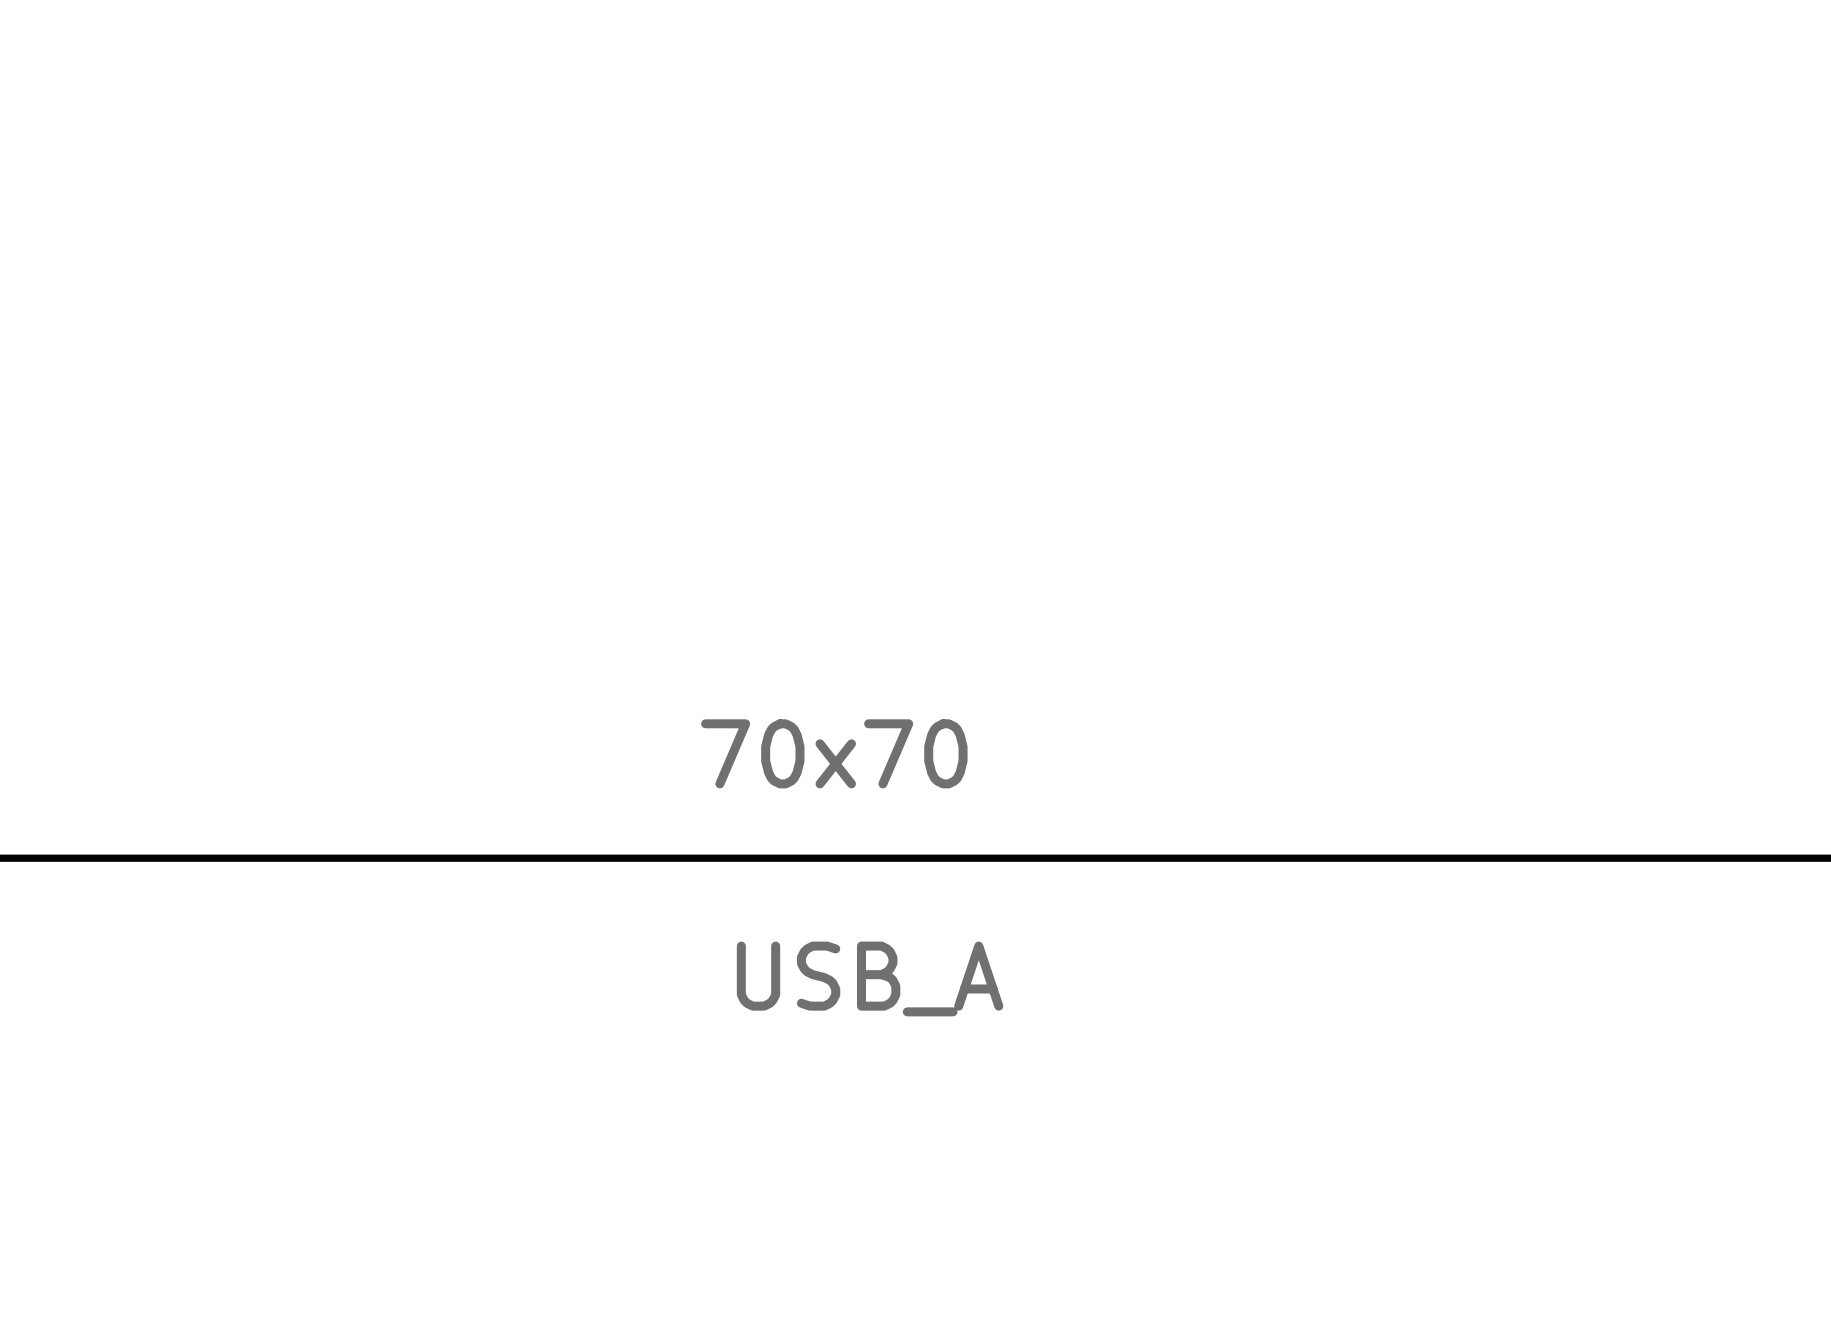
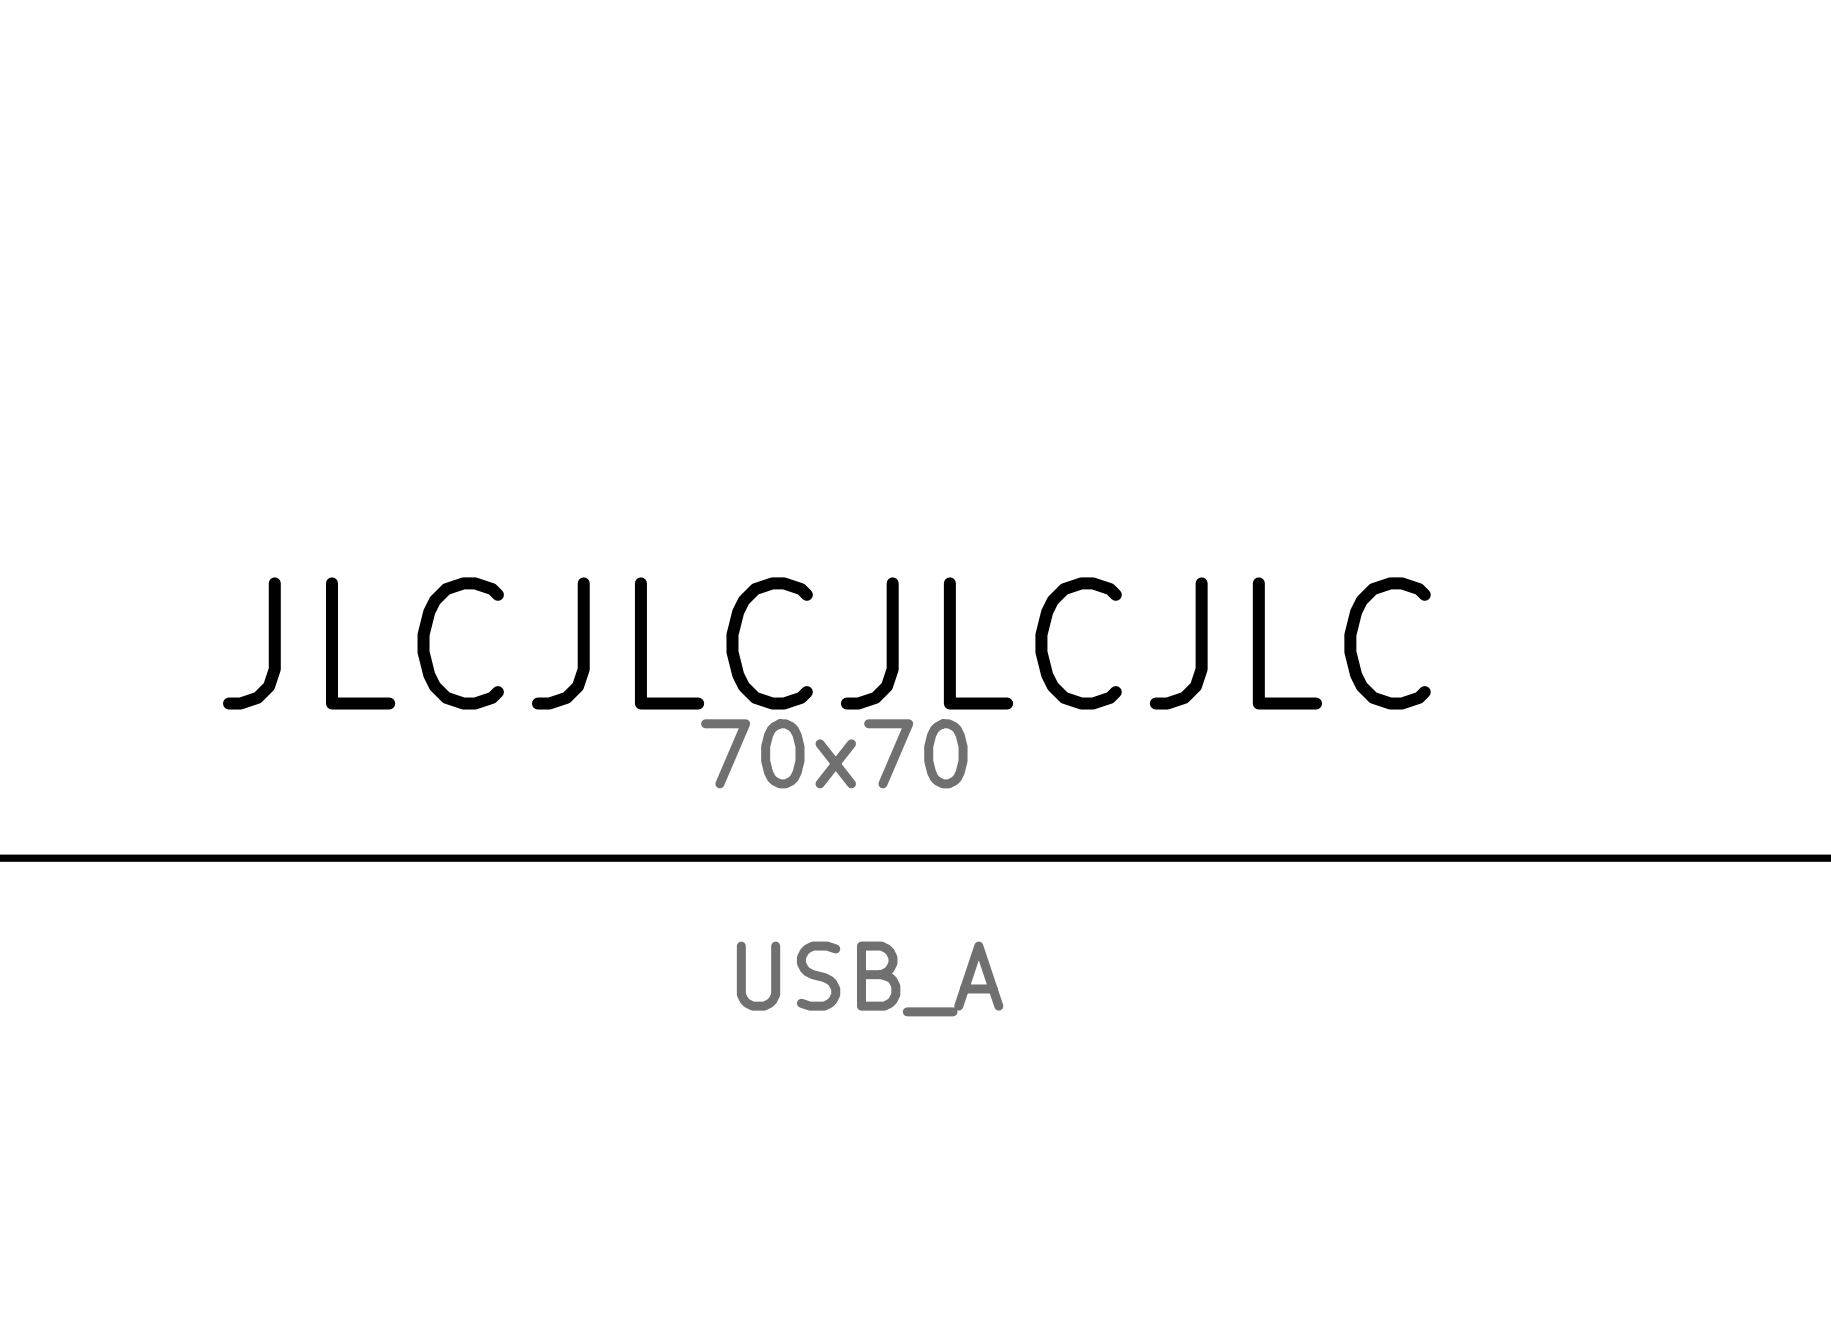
part text: none -> JLCJLCJLCJLC (826, 643)

